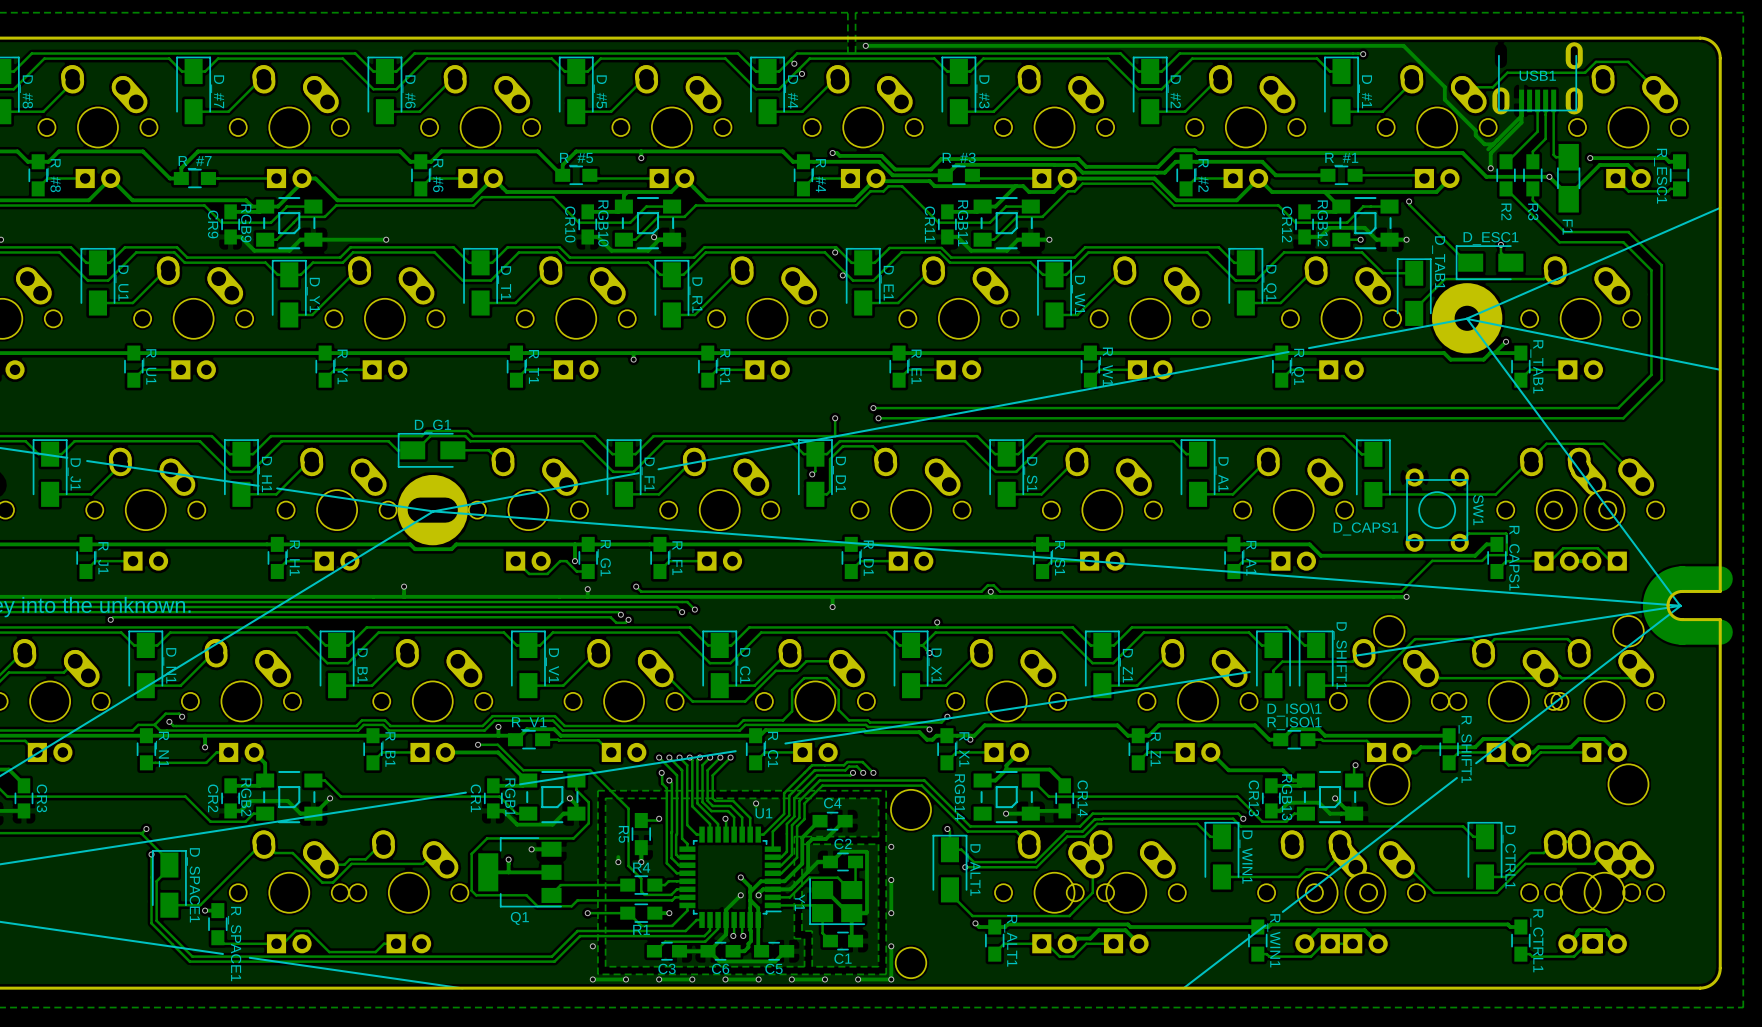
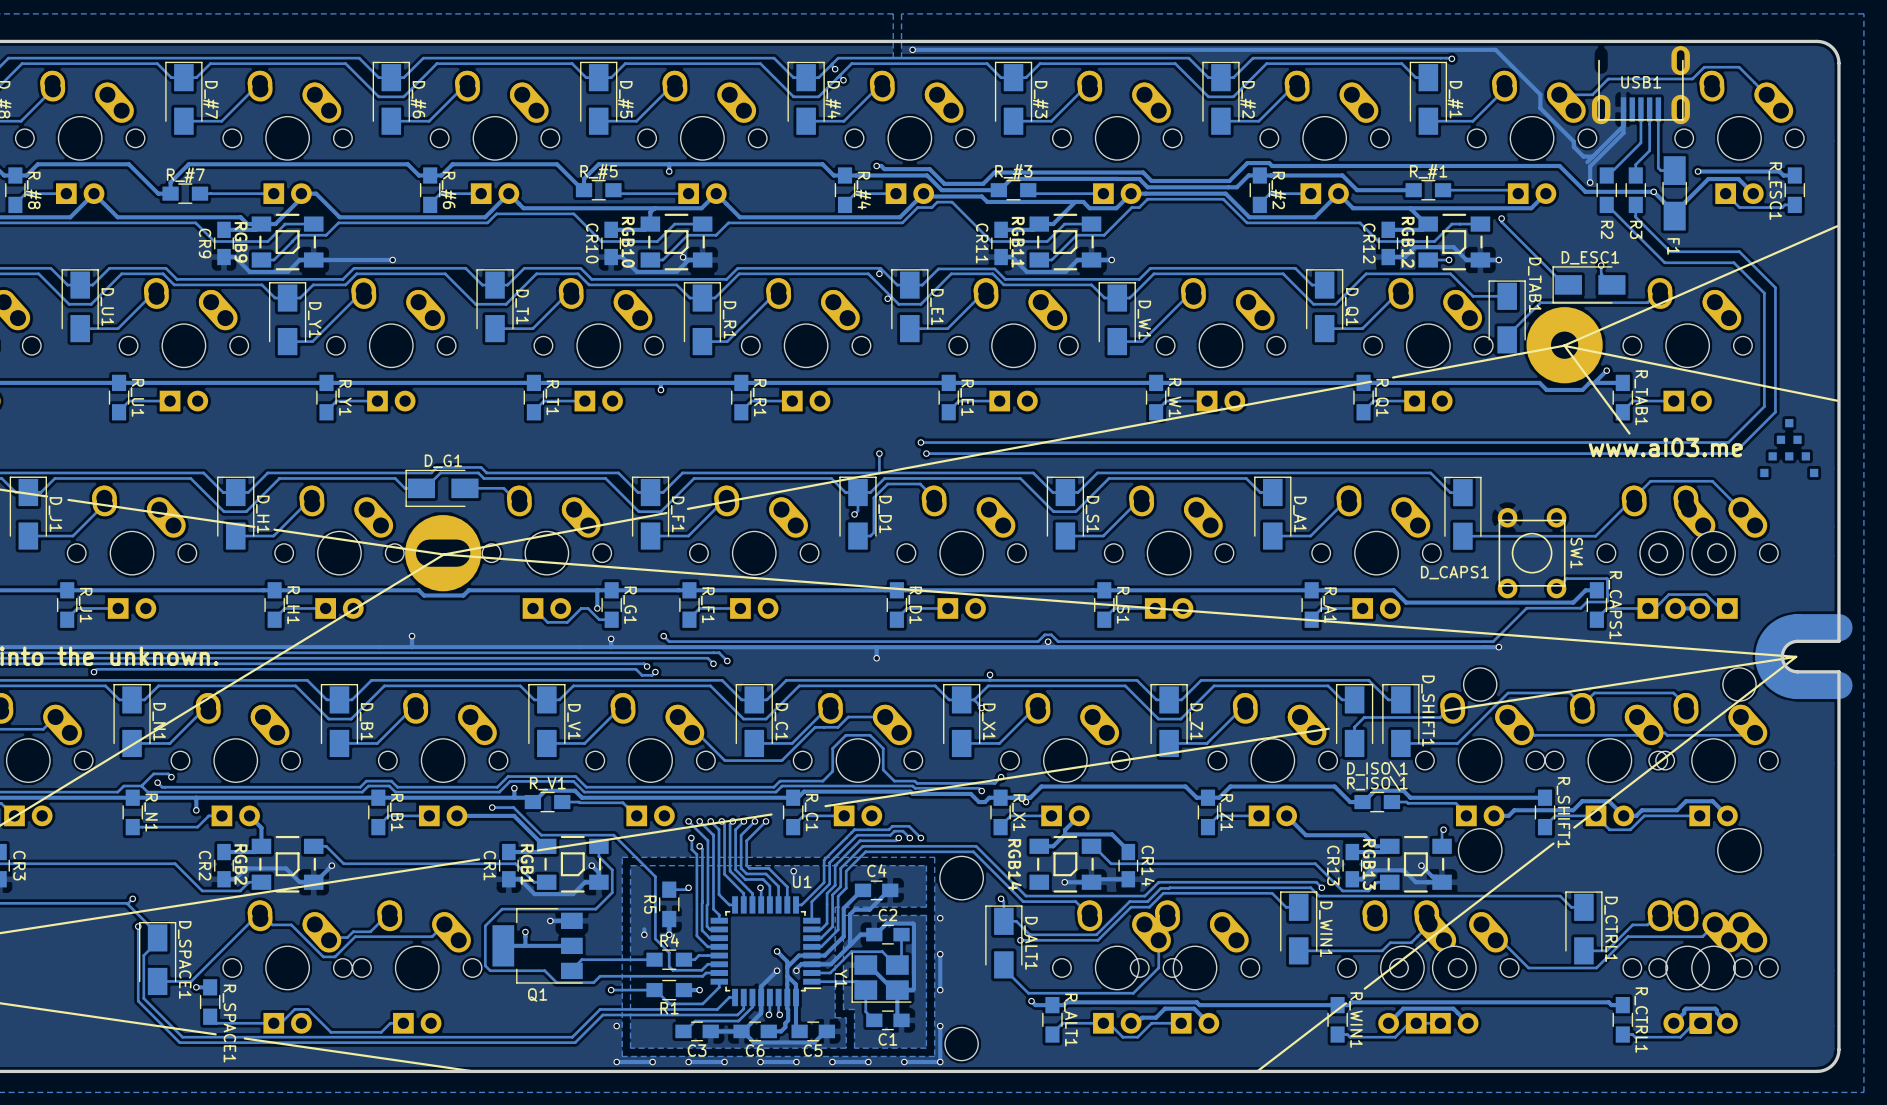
line: (1467, 318) (1680, 605) -> (1564, 345) (1629, 433)
text: none -> www.ai03.me (1665, 447)
part: none -> (1789, 448)

